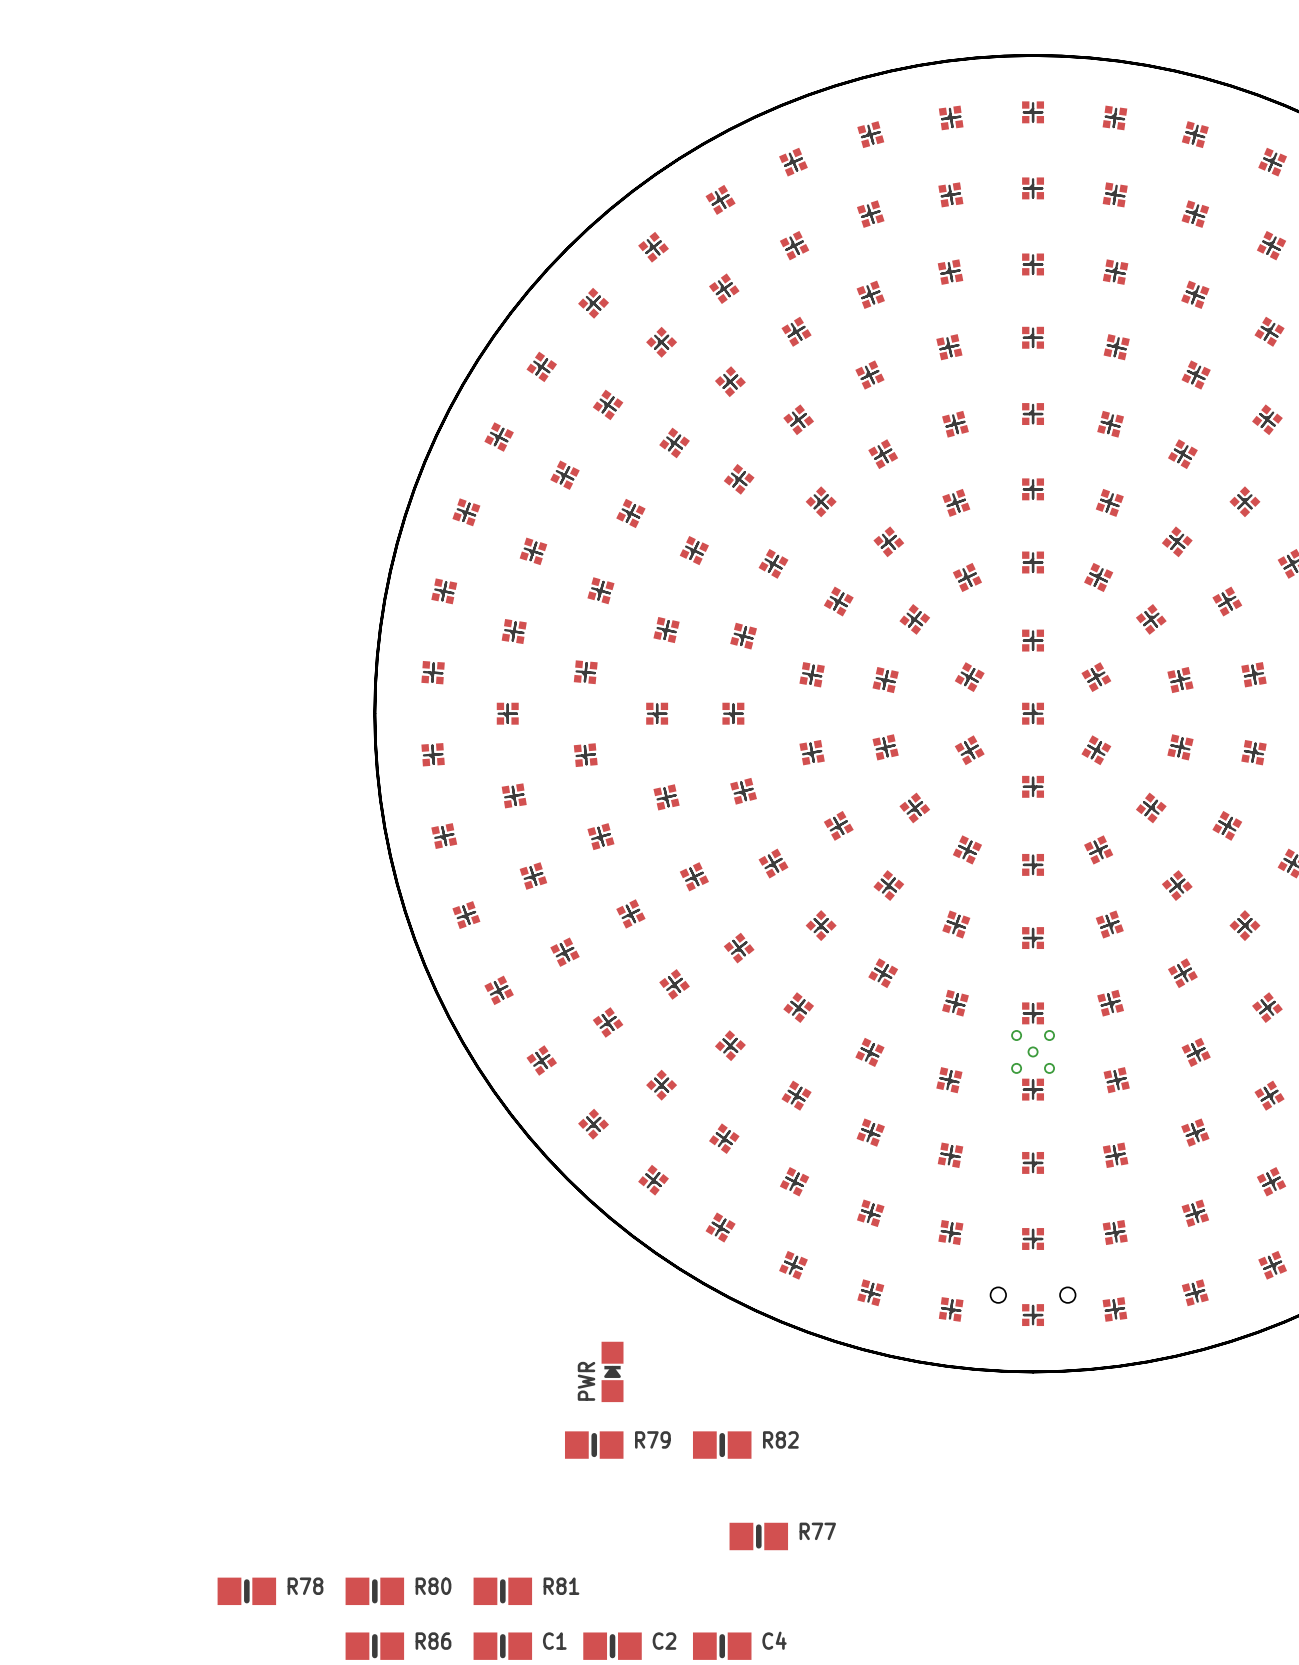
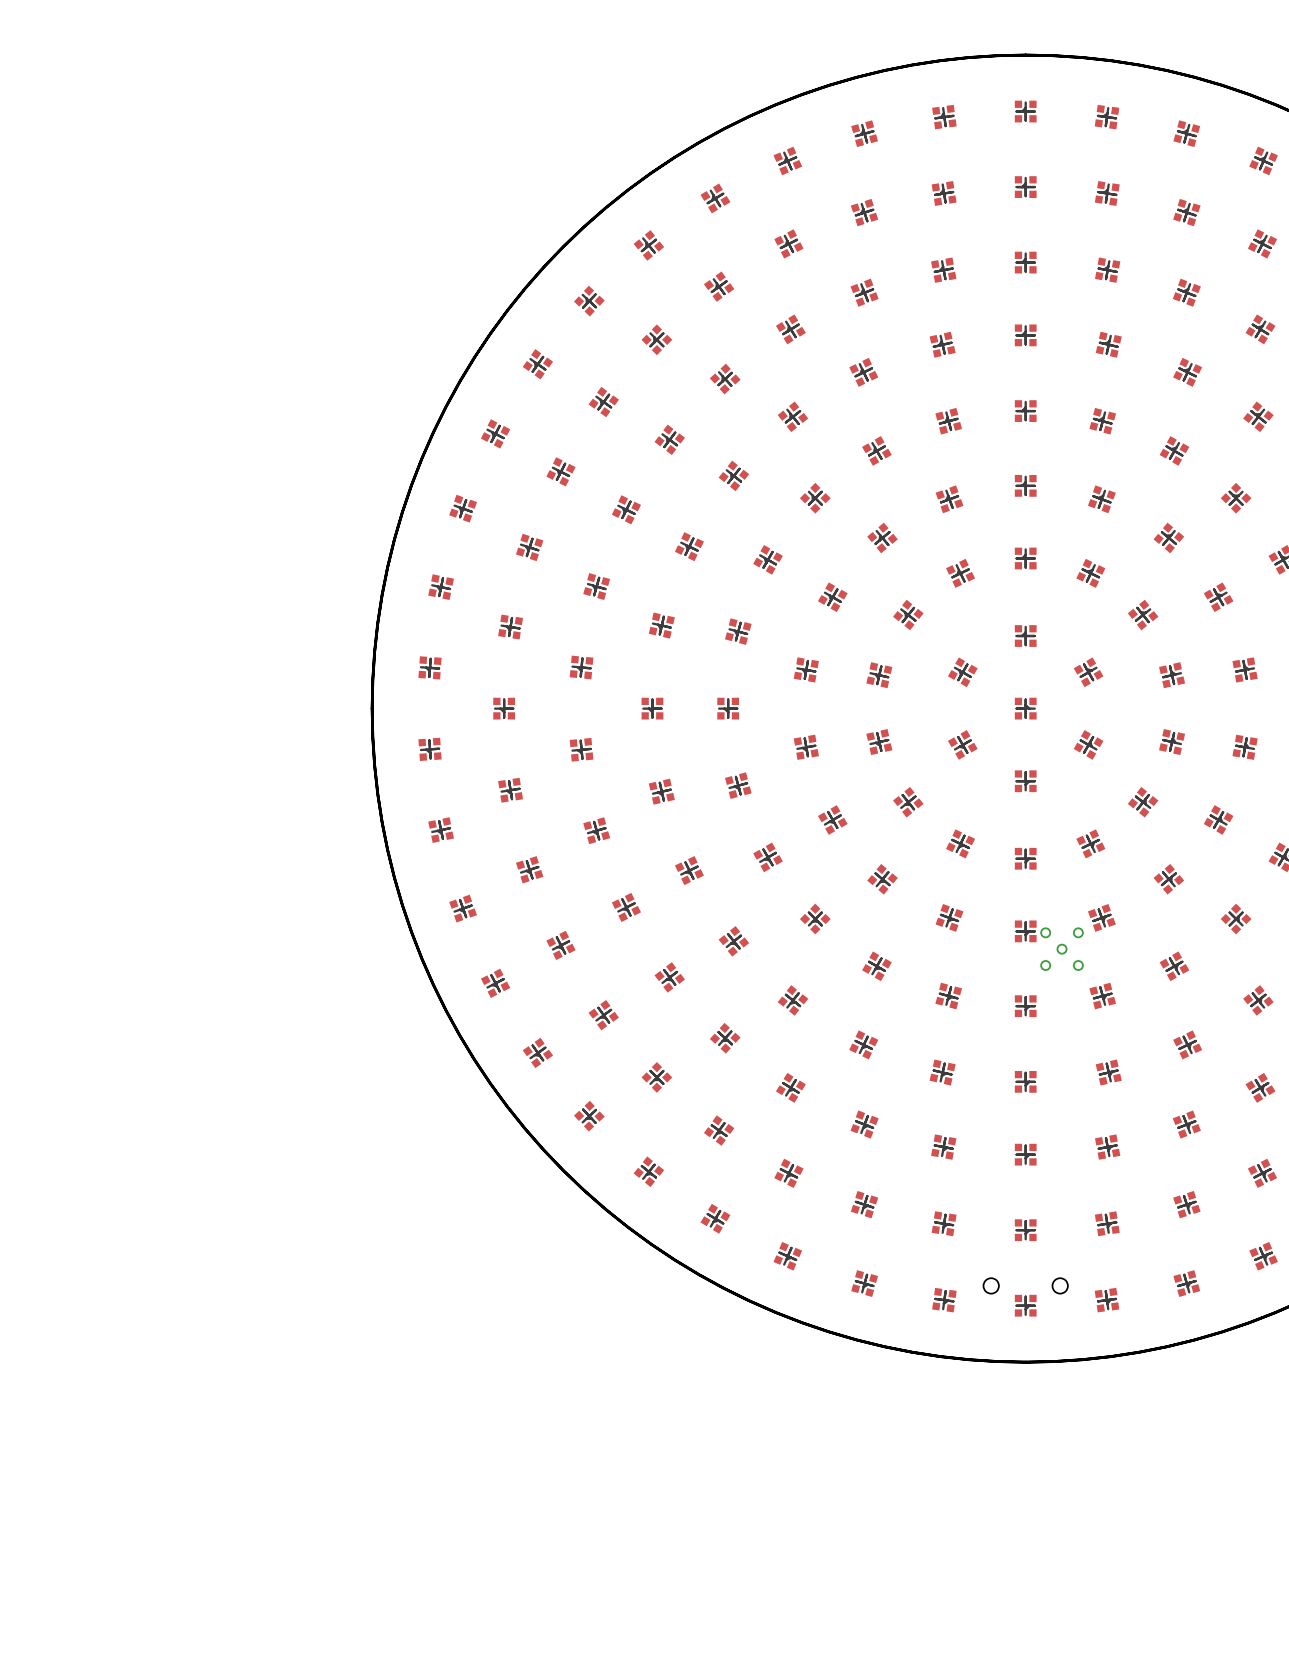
part position: (1033, 1051) -> (1062, 949)
PWR: (612, 1371) -> none
R79: (594, 1445) -> none
R82: (722, 1445) -> none
R77: (758, 1536) -> none
R78: (246, 1591) -> none
R80: (374, 1591) -> none
R81: (502, 1591) -> none
R86: (374, 1646) -> none
C1: (502, 1646) -> none
C2: (612, 1646) -> none
C4: (722, 1646) -> none

